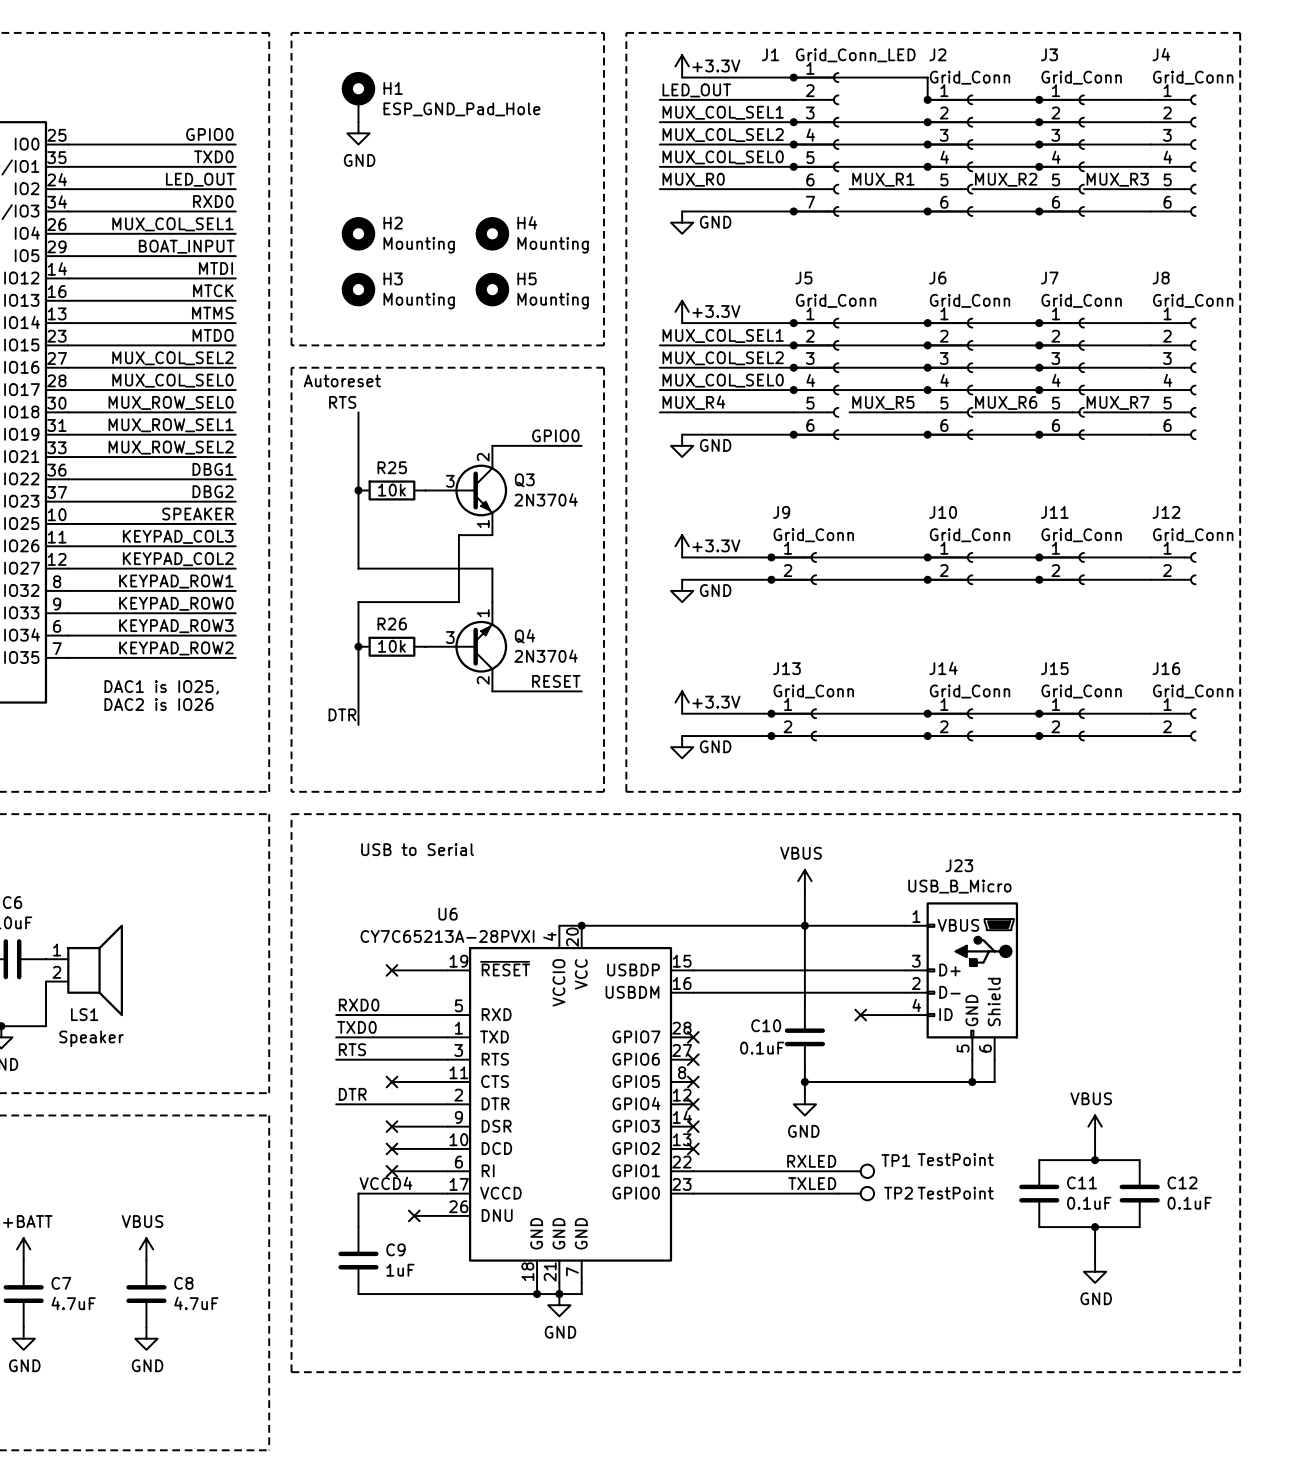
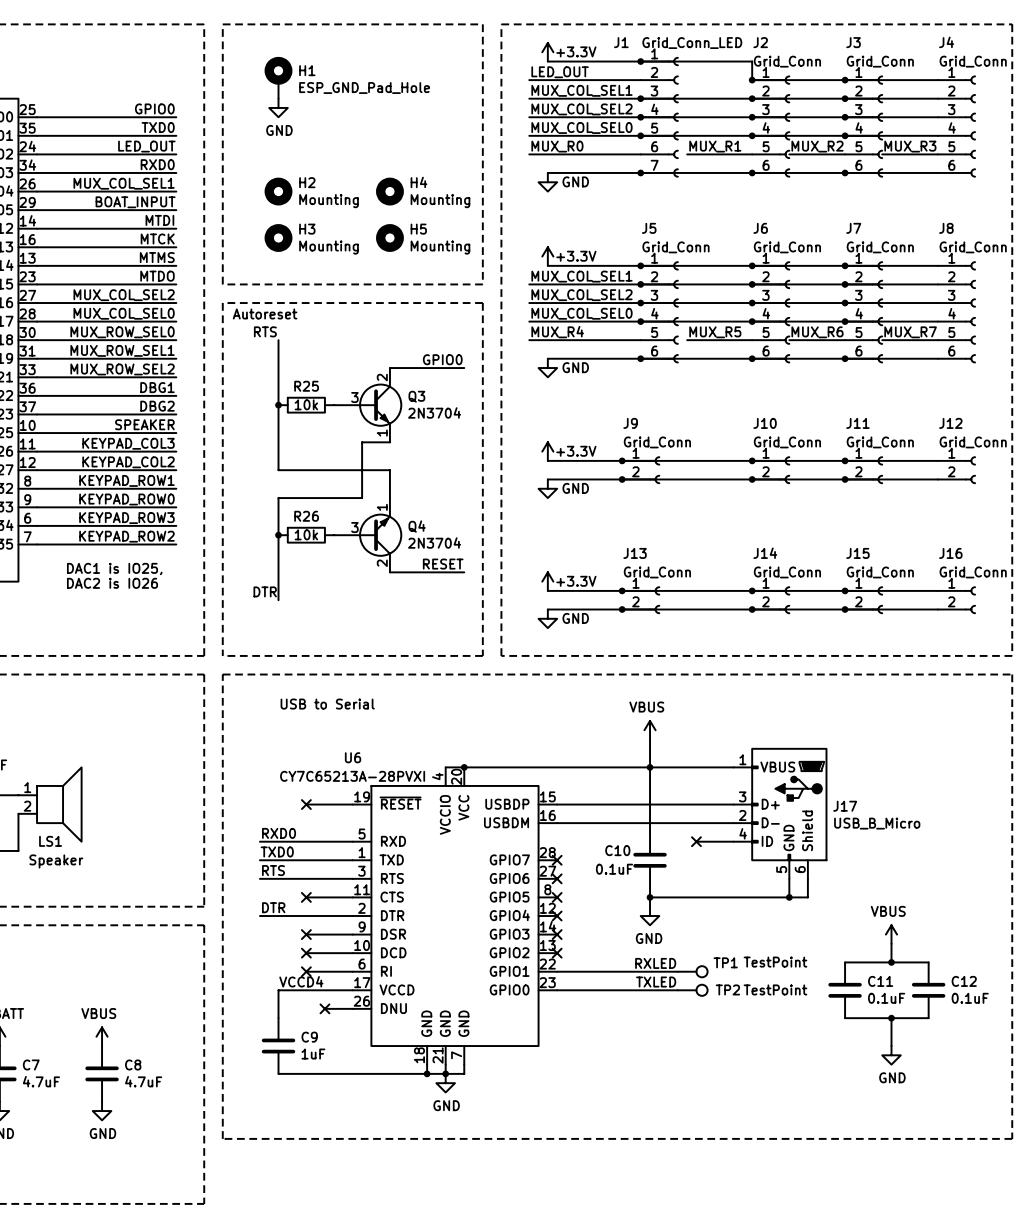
J23 name: J23 (959, 865) -> J17 (845, 806)
J23 value position: USB_B_Micro (959, 886) -> USB_B_Micro (877, 823)

